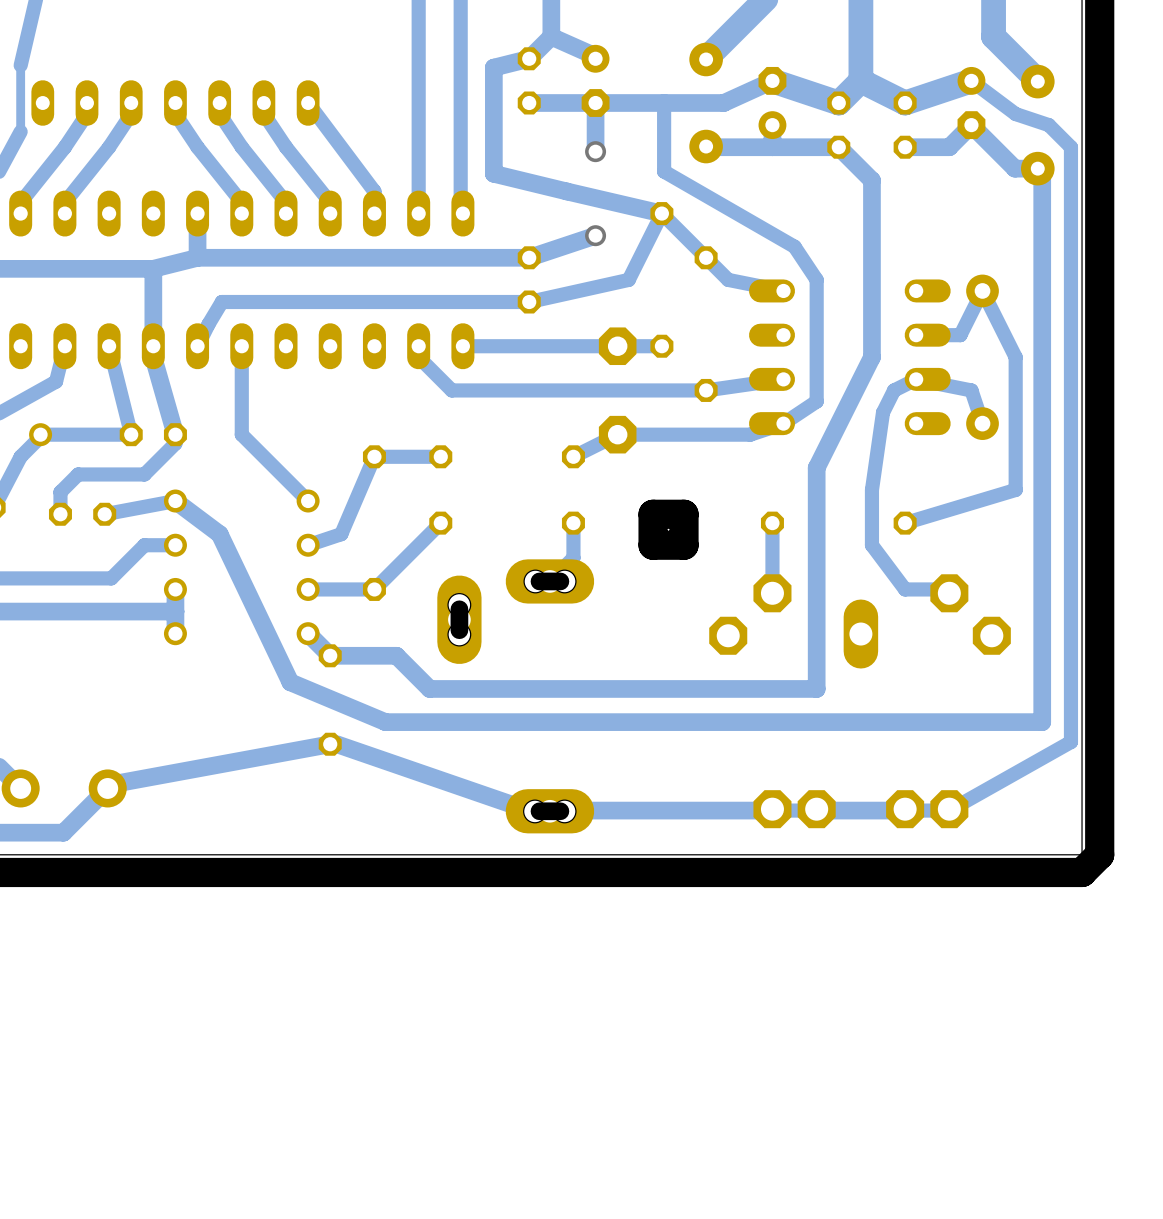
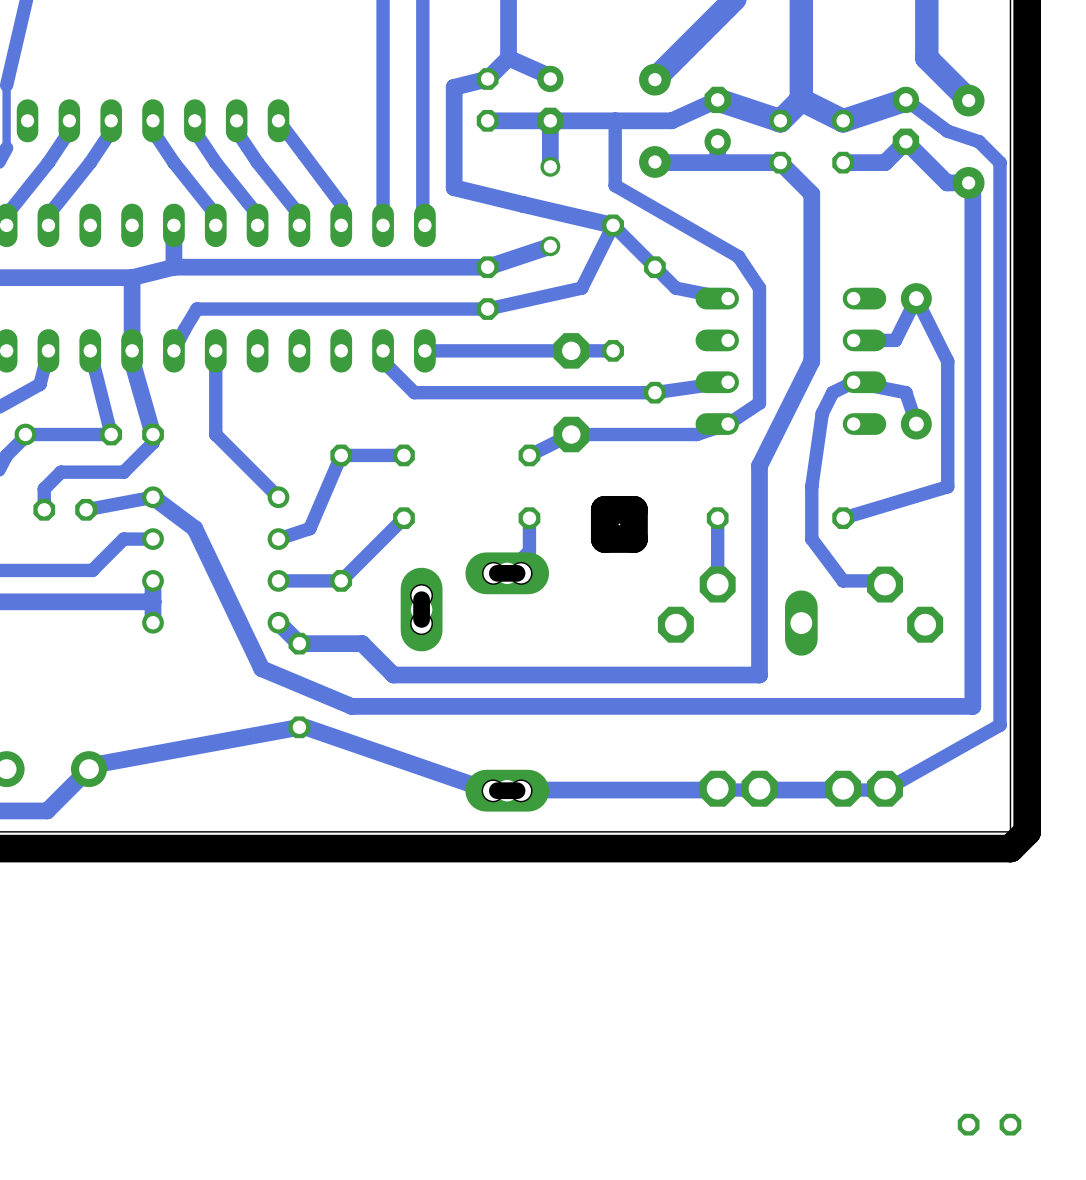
part: none -> (989, 1124)

